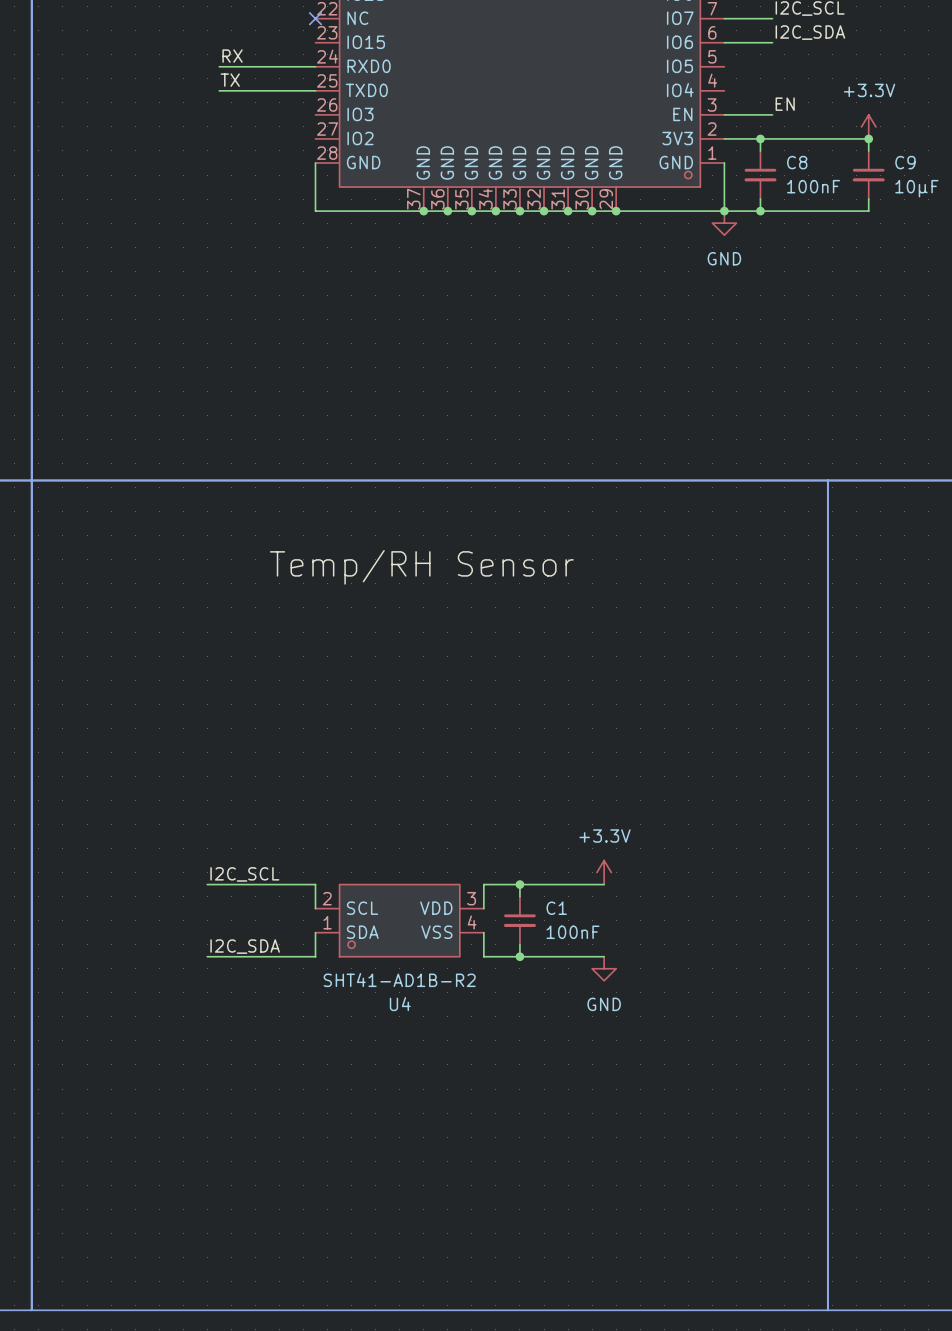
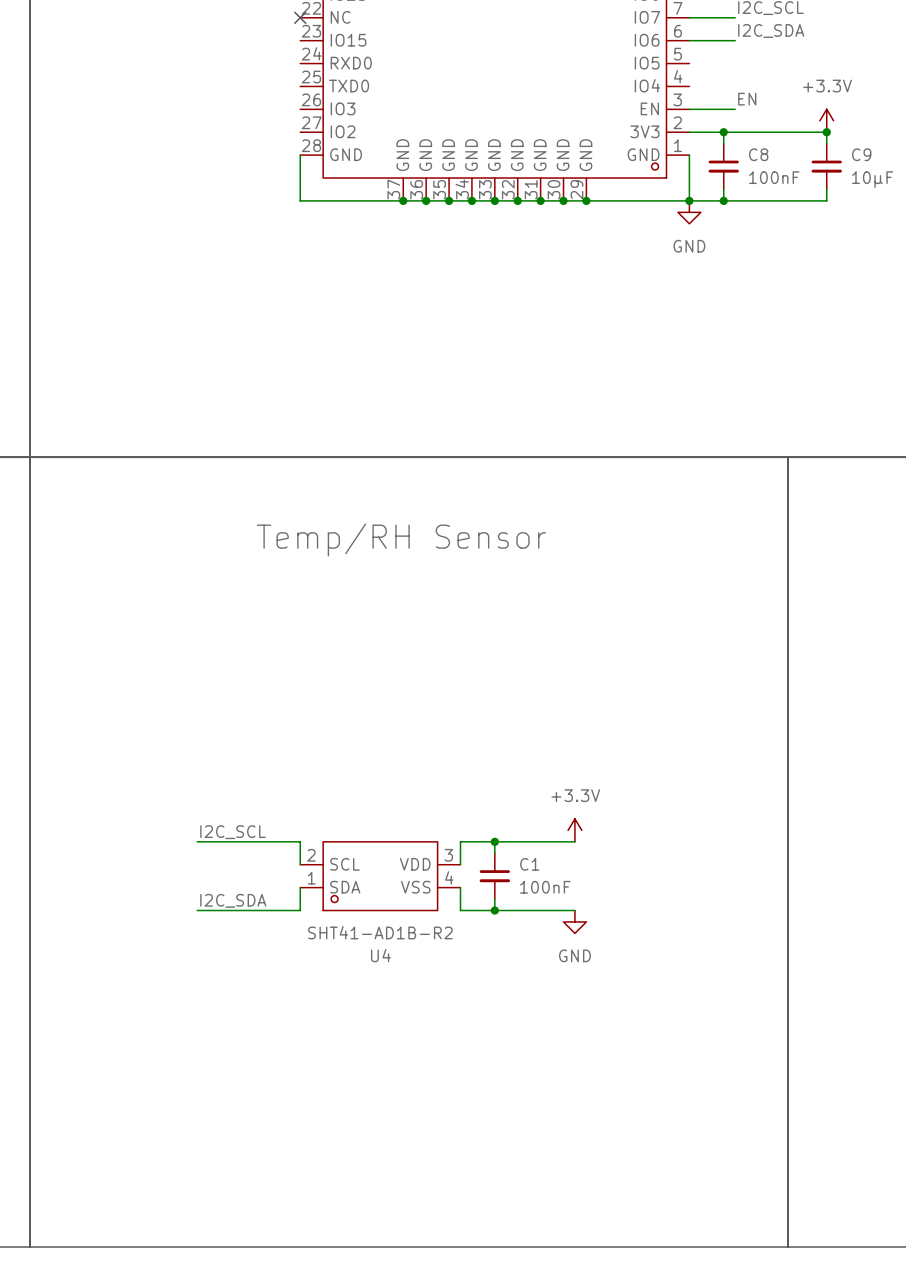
label: RX (232, 56) -> none
wire: (219, 66) (315, 66) -> none
label: TX (230, 80) -> none
wire: (219, 90) (315, 90) -> none

